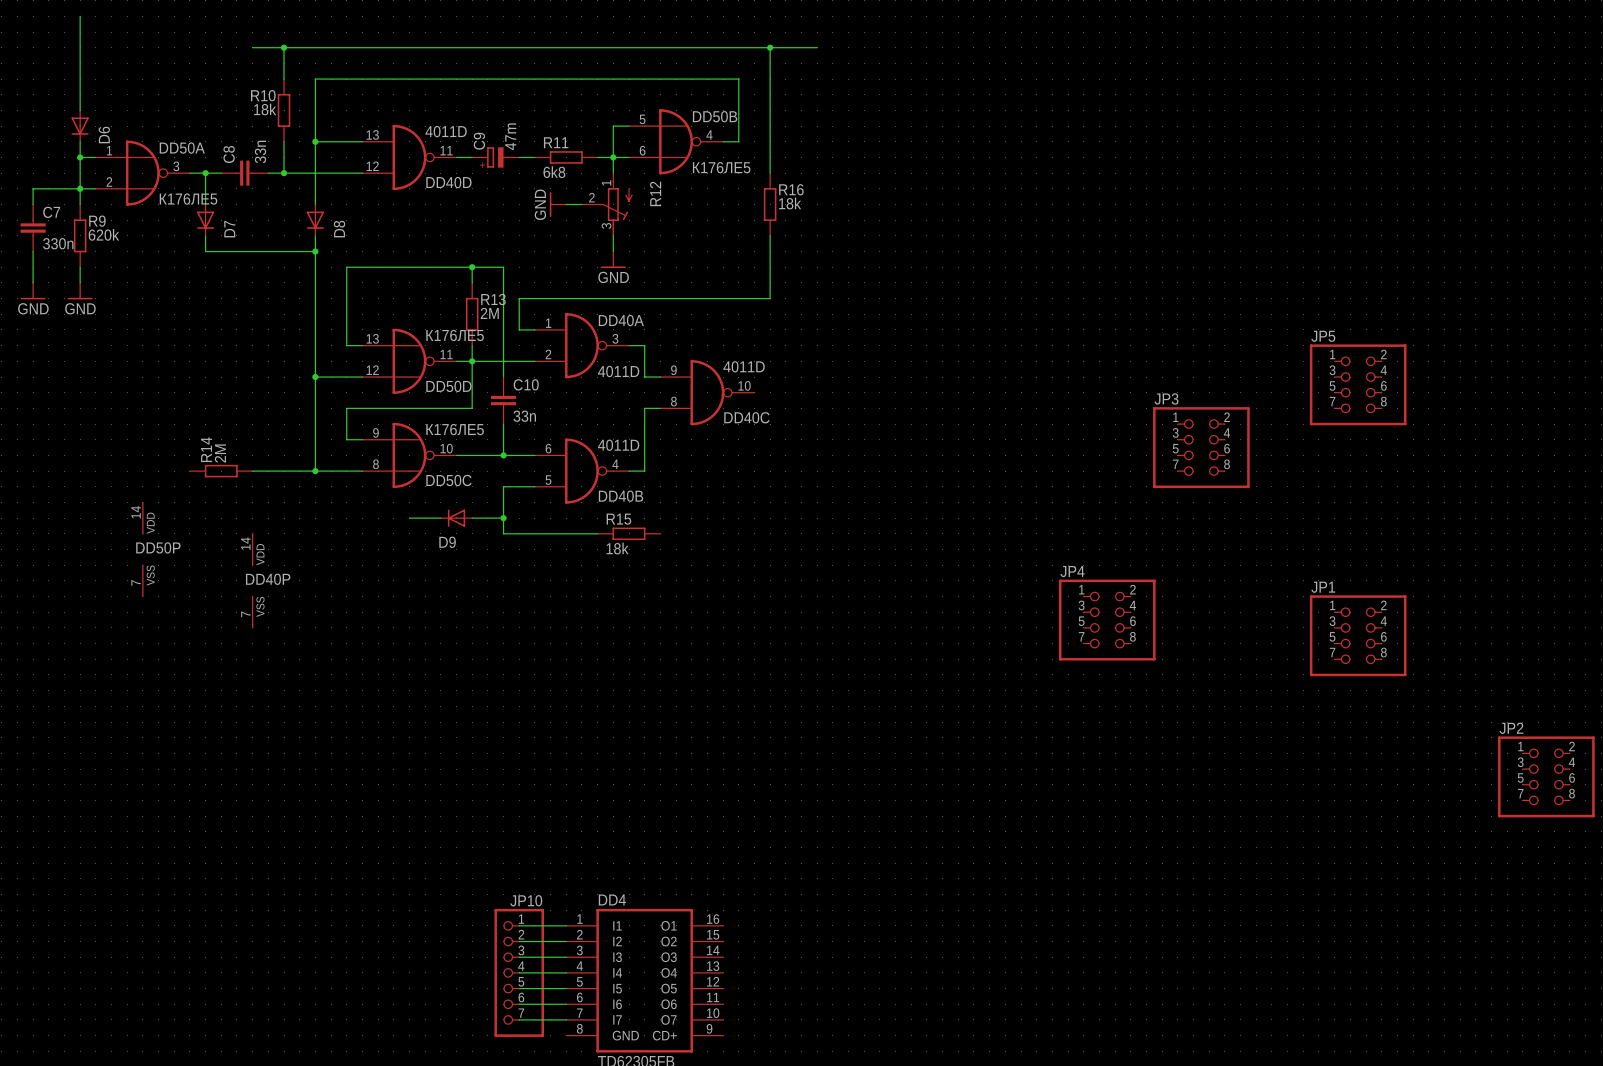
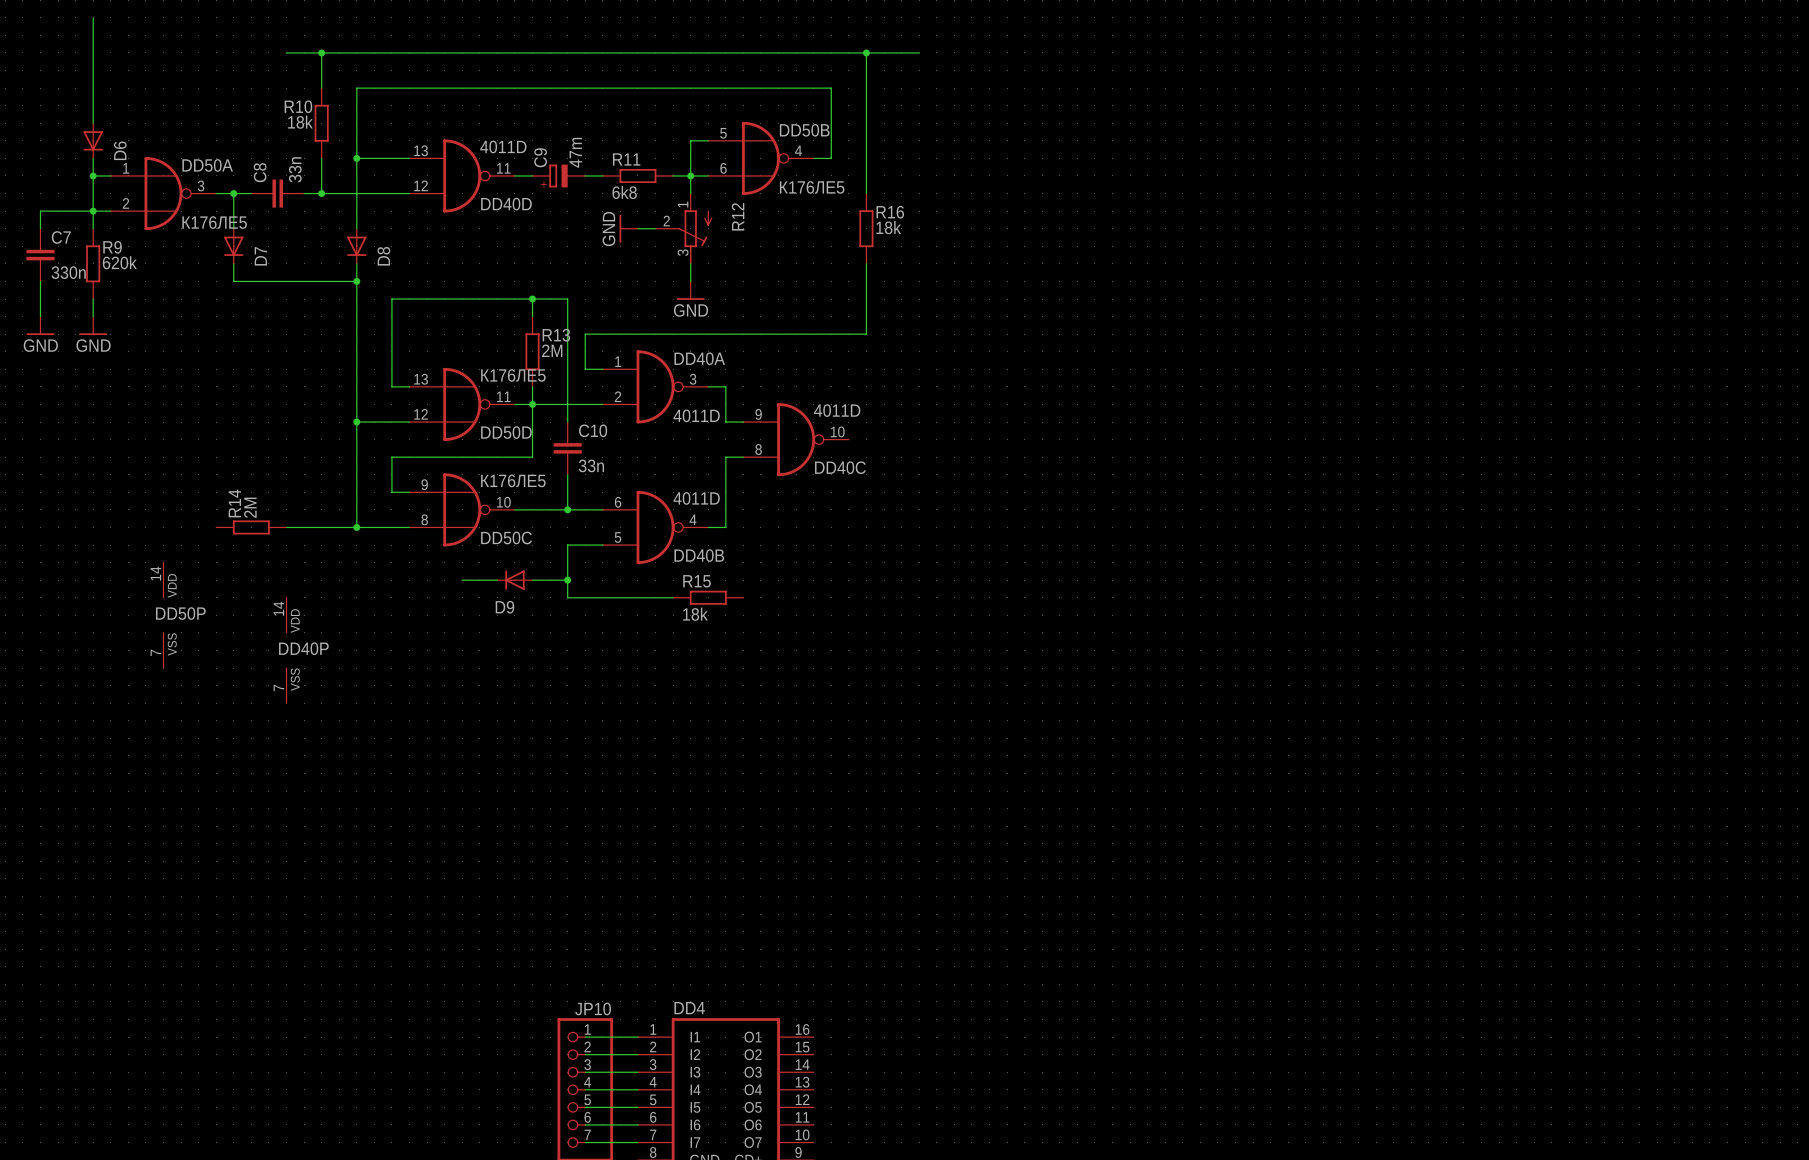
JP5: (1358, 384) -> none
JP3: (1201, 447) -> none
JP4: (1107, 620) -> none
JP1: (1358, 635) -> none
JP2: (1546, 776) -> none

